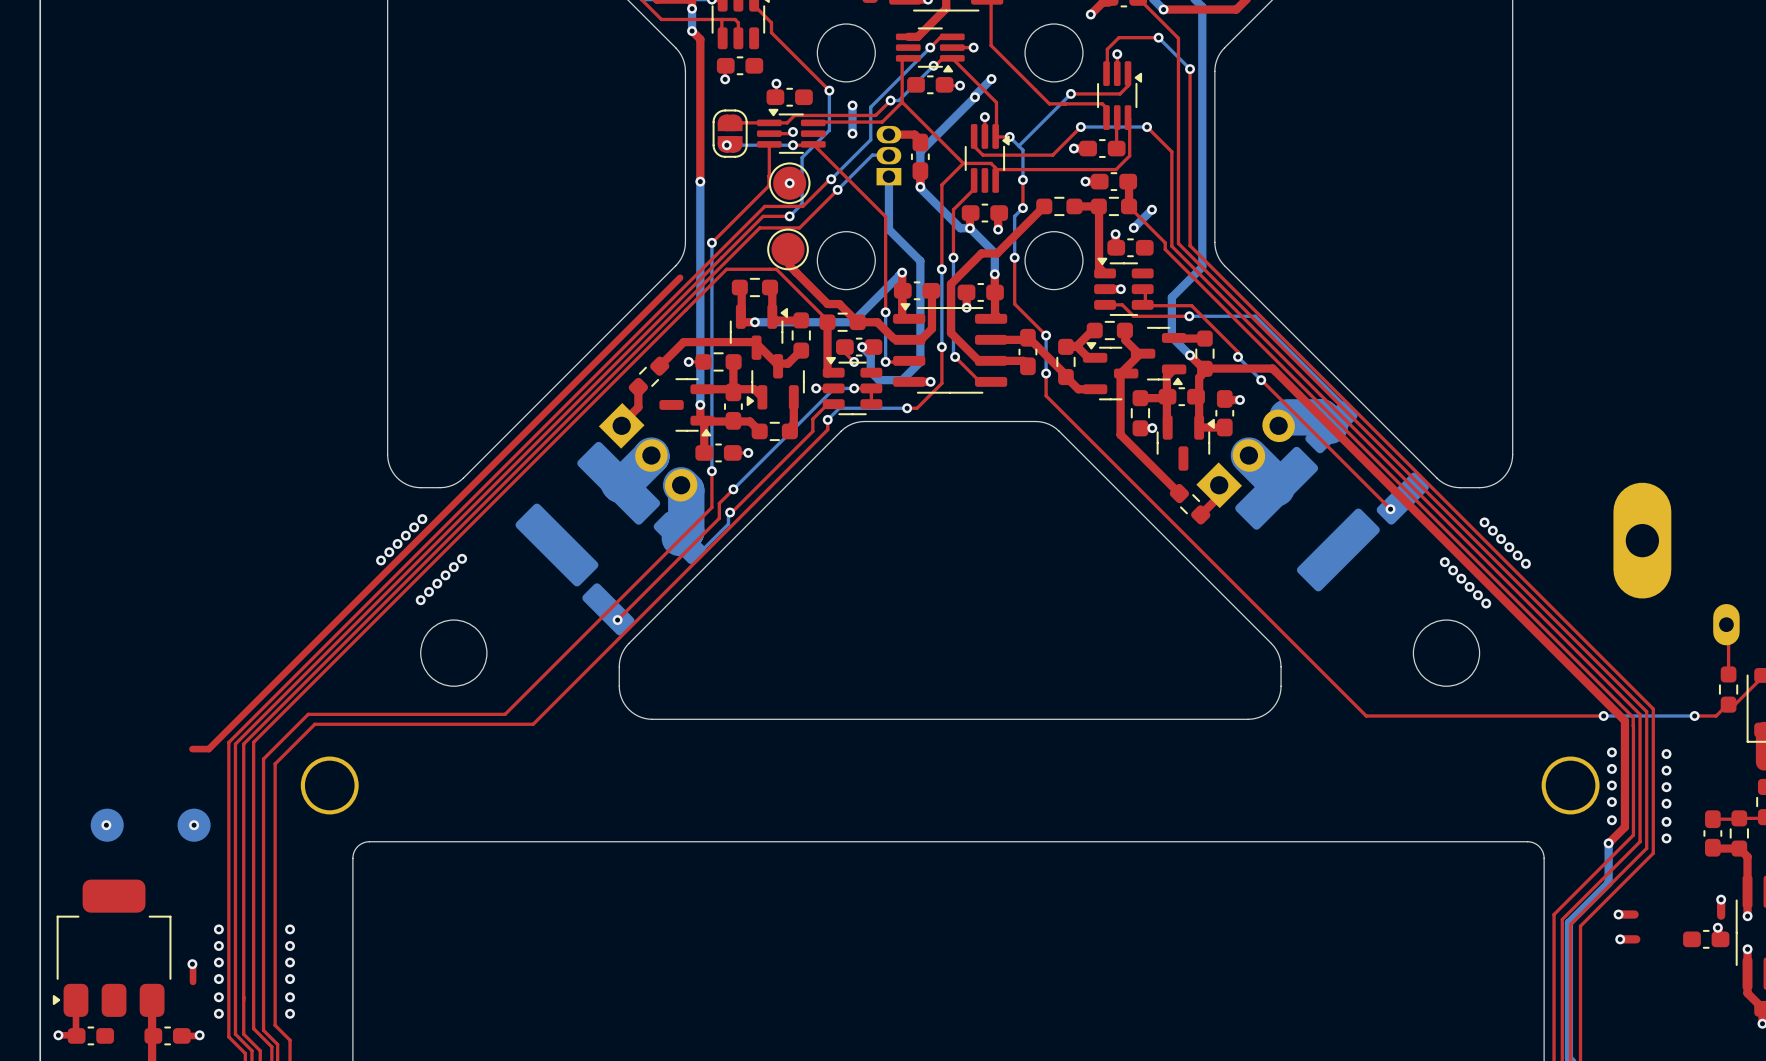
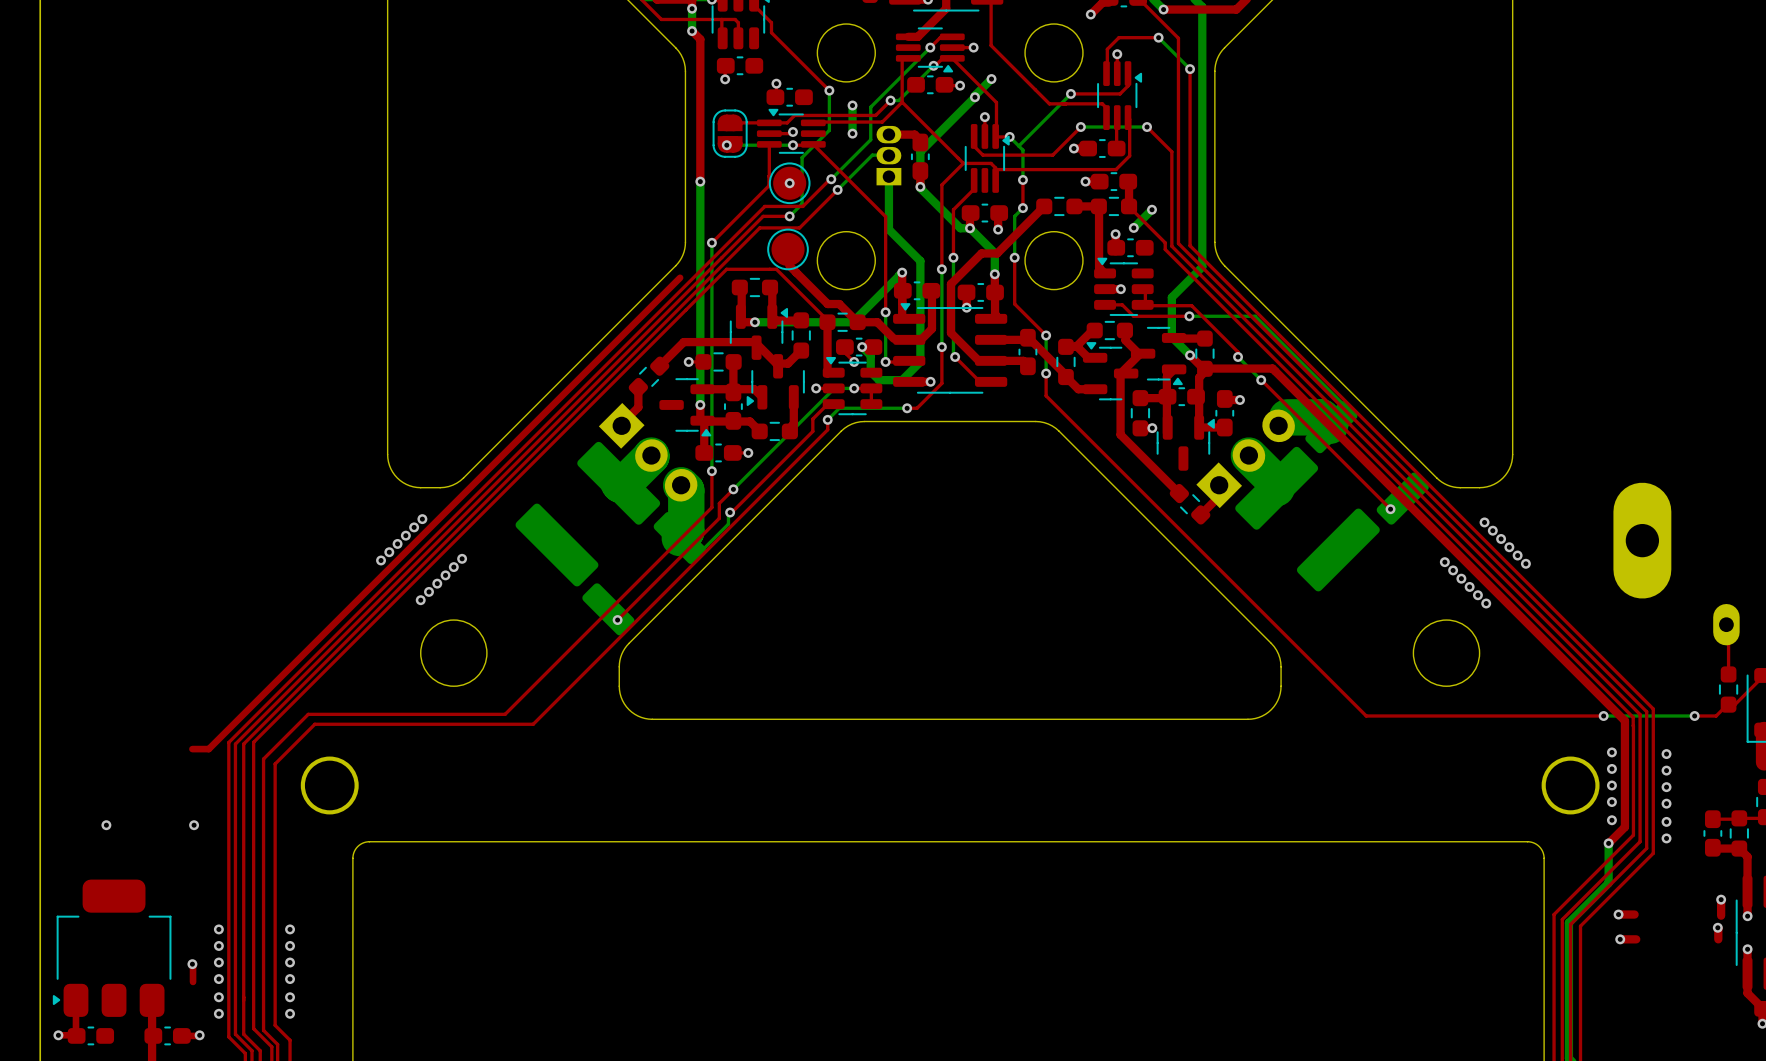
part: (107, 825) -> none
part: (194, 825) -> none
part: (1706, 939) -> none

